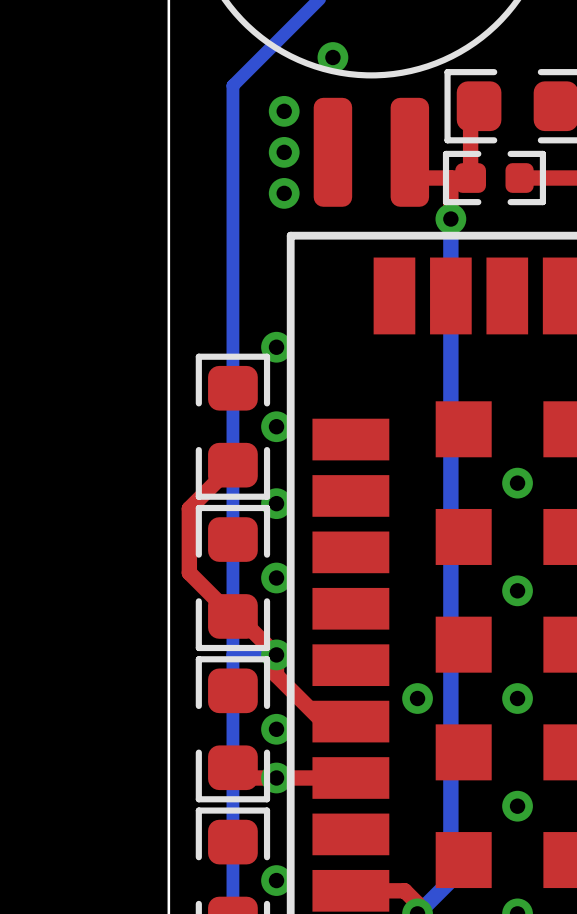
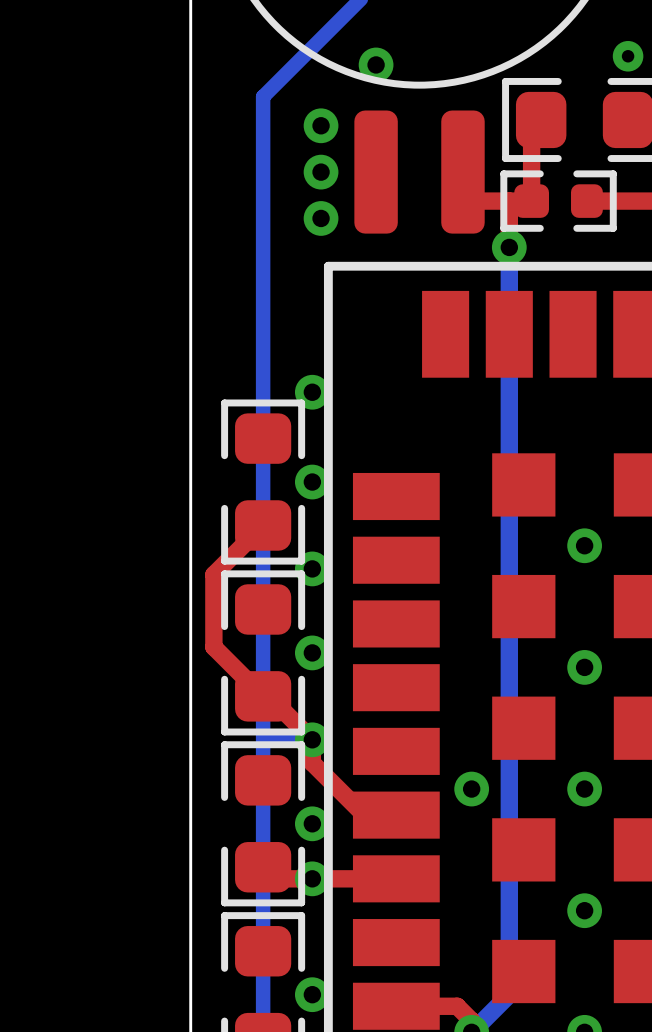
via: none -> (628, 56)

